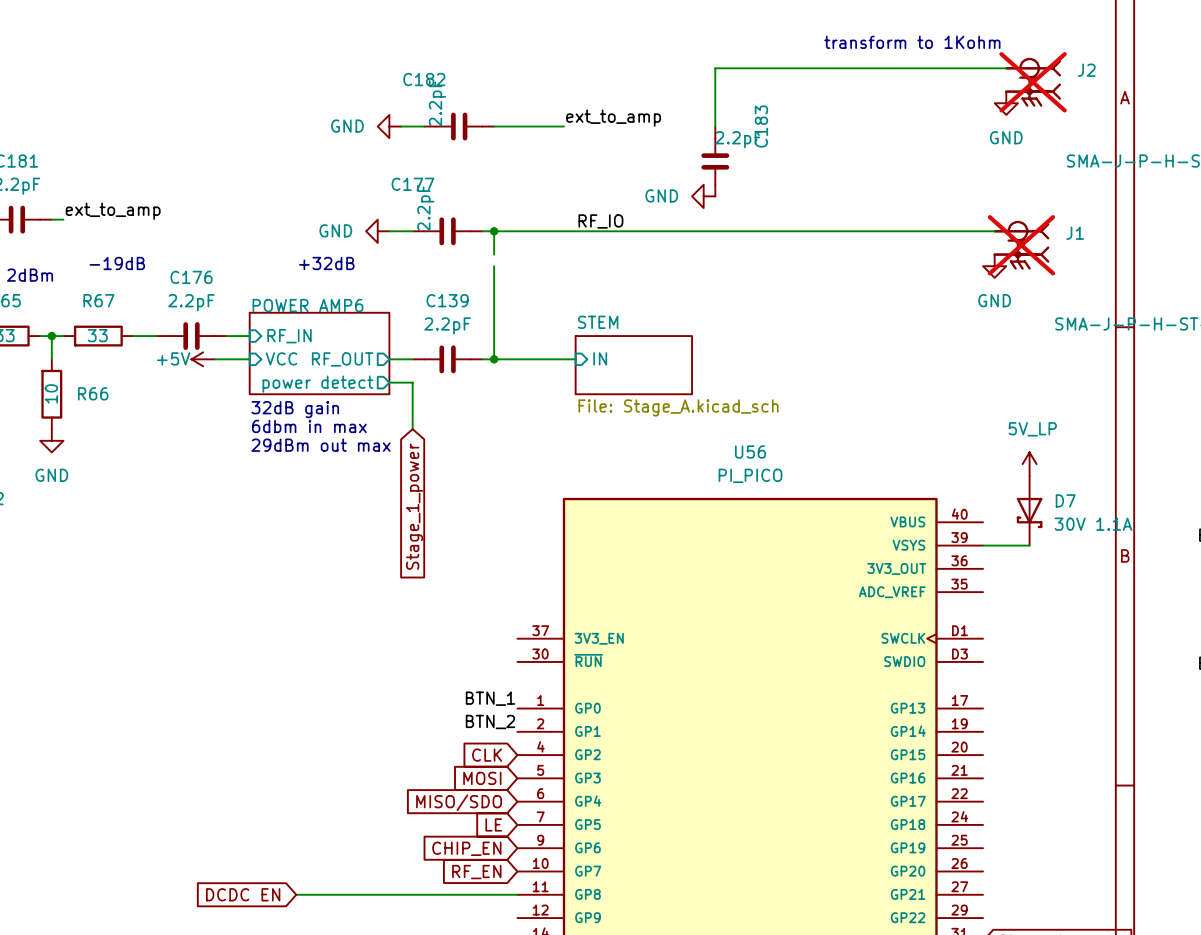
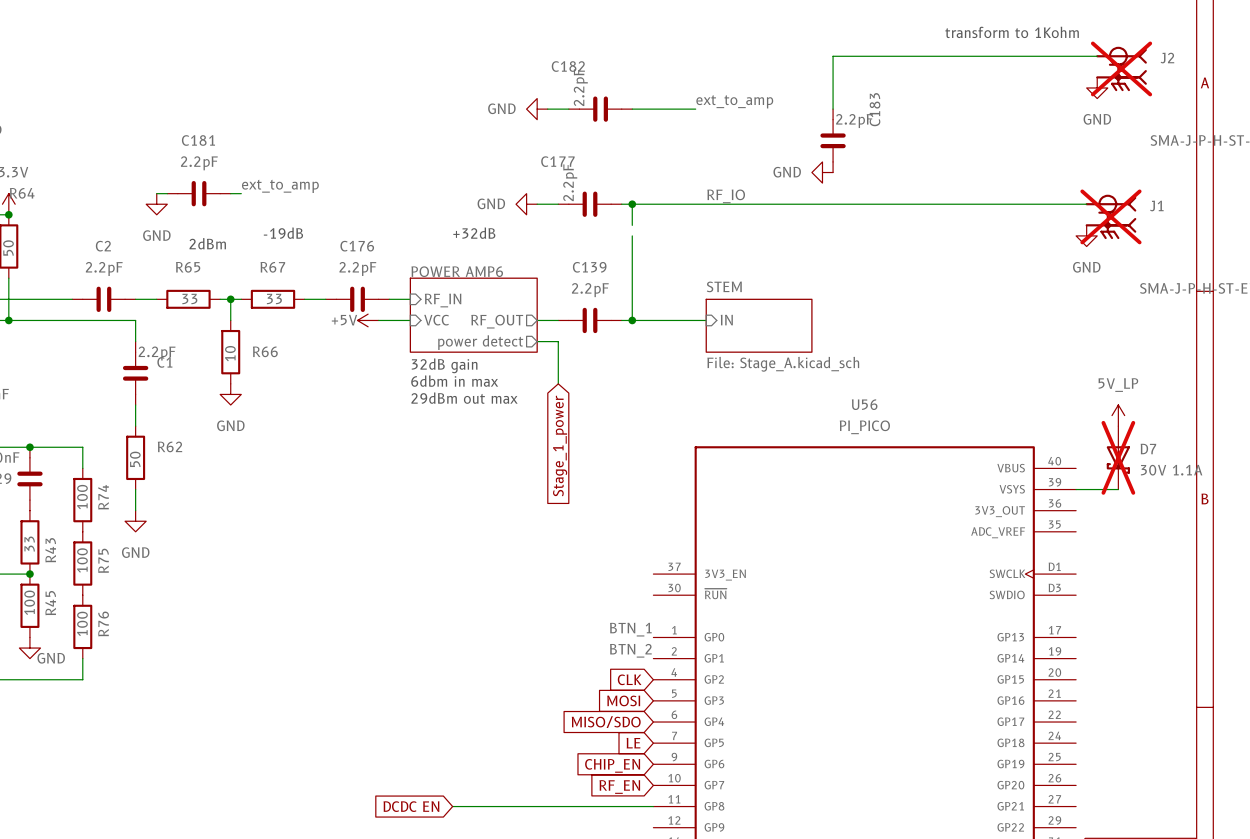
D7 do-not-place cross: none -> (1118, 457)

